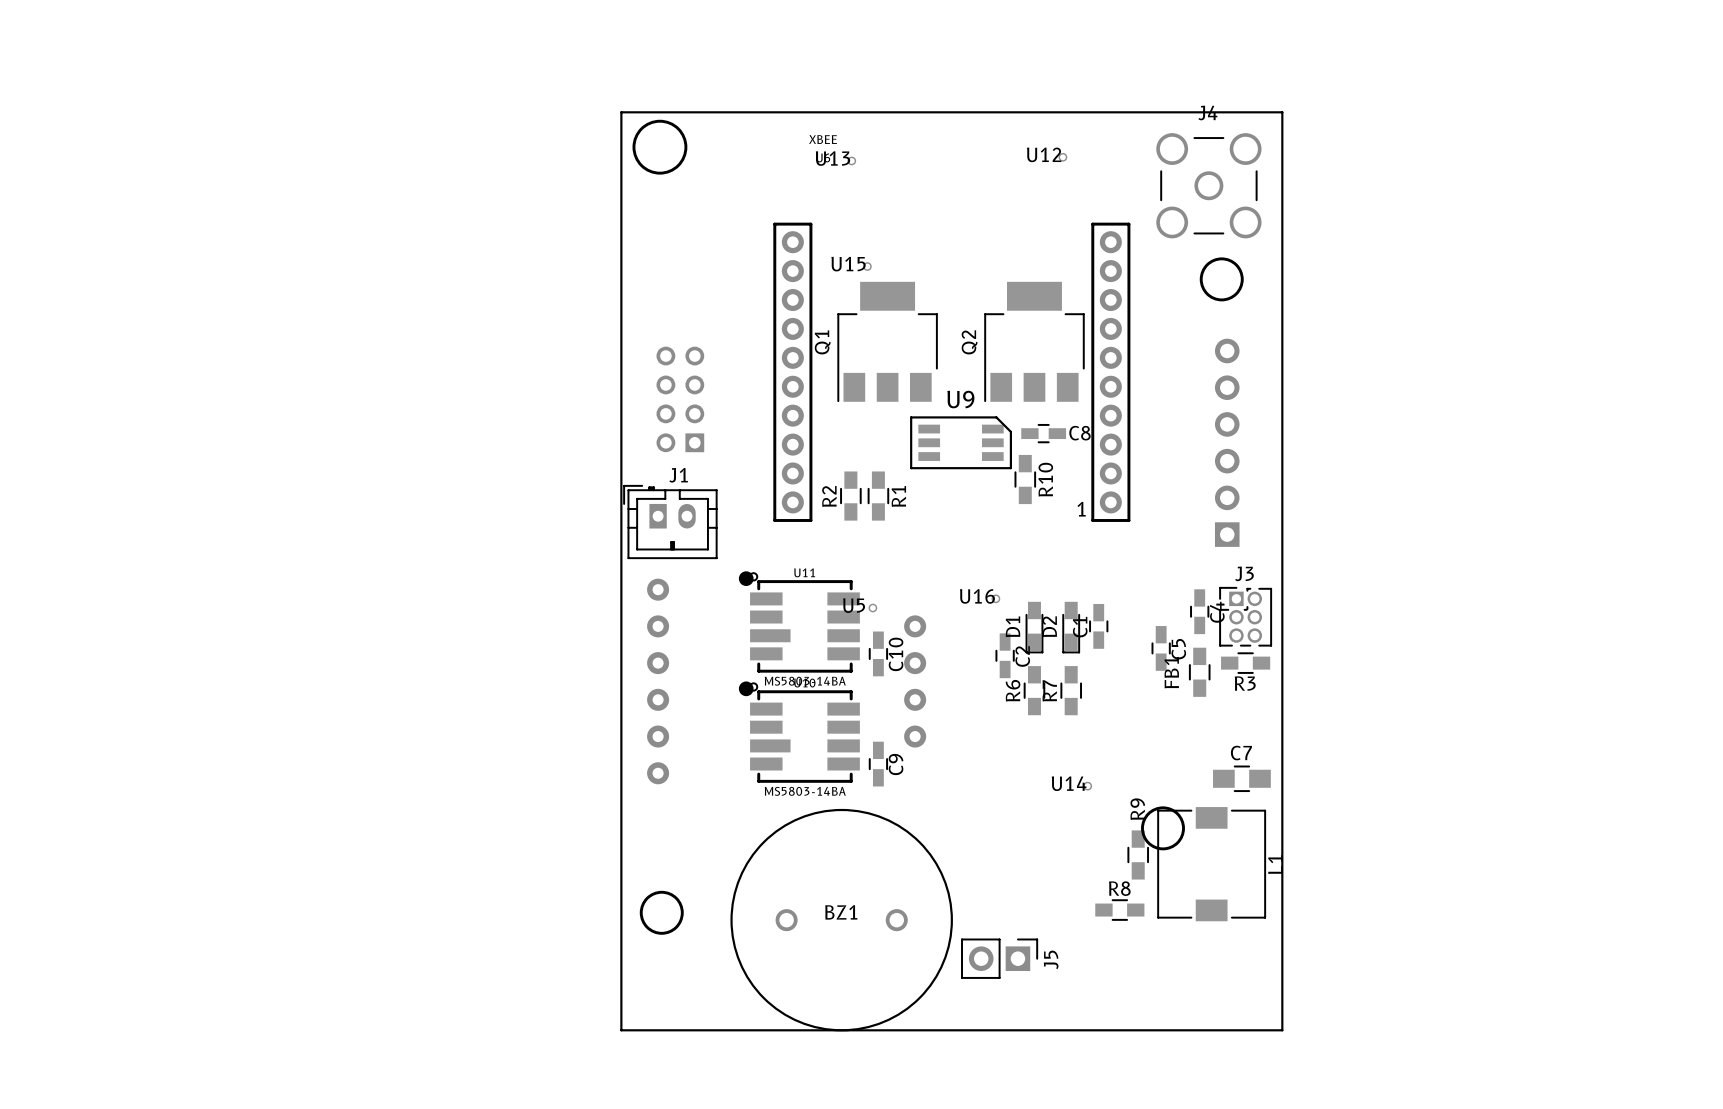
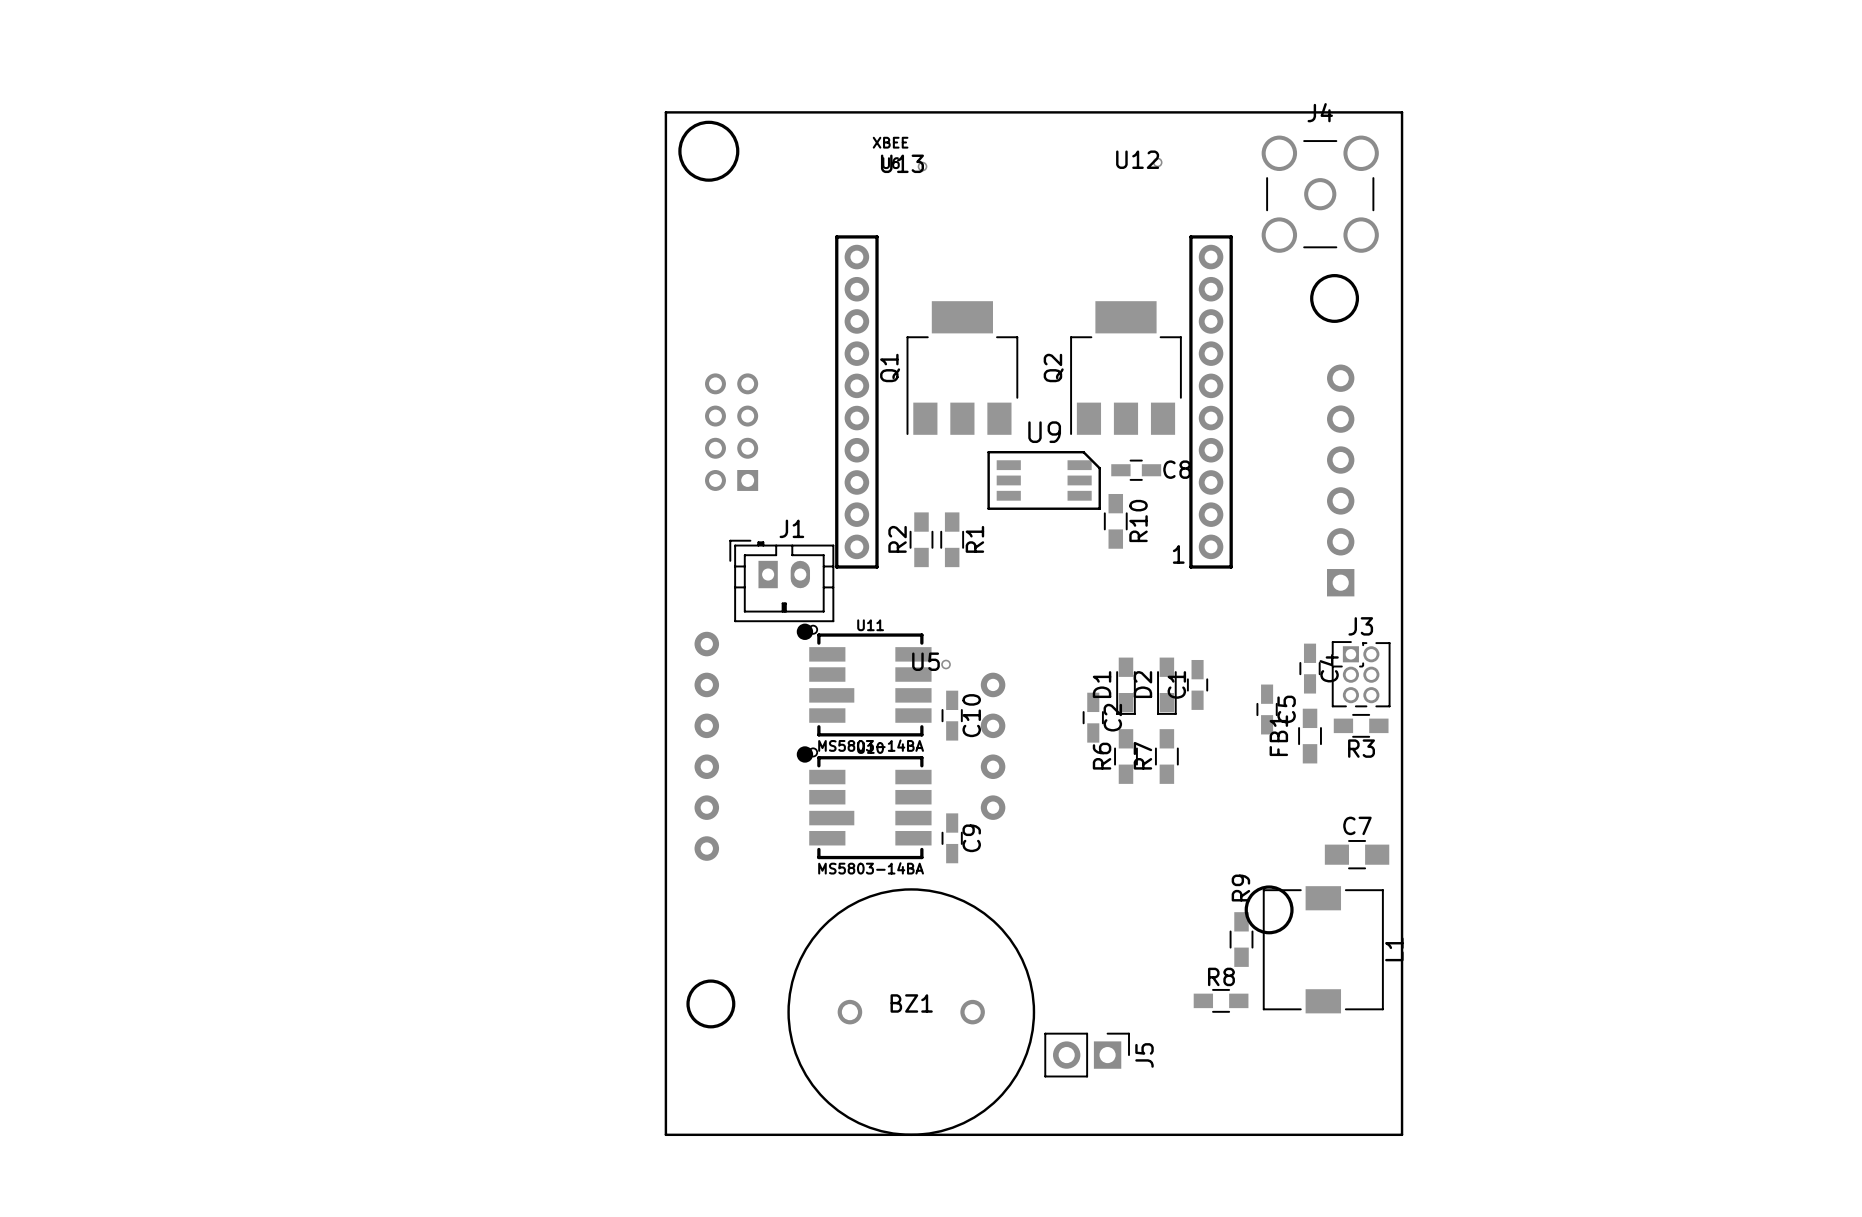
U15: (867, 266) -> none
J1 position: (670, 522) -> (781, 580)
U16: (995, 598) -> none
U14: (1087, 786) -> none

